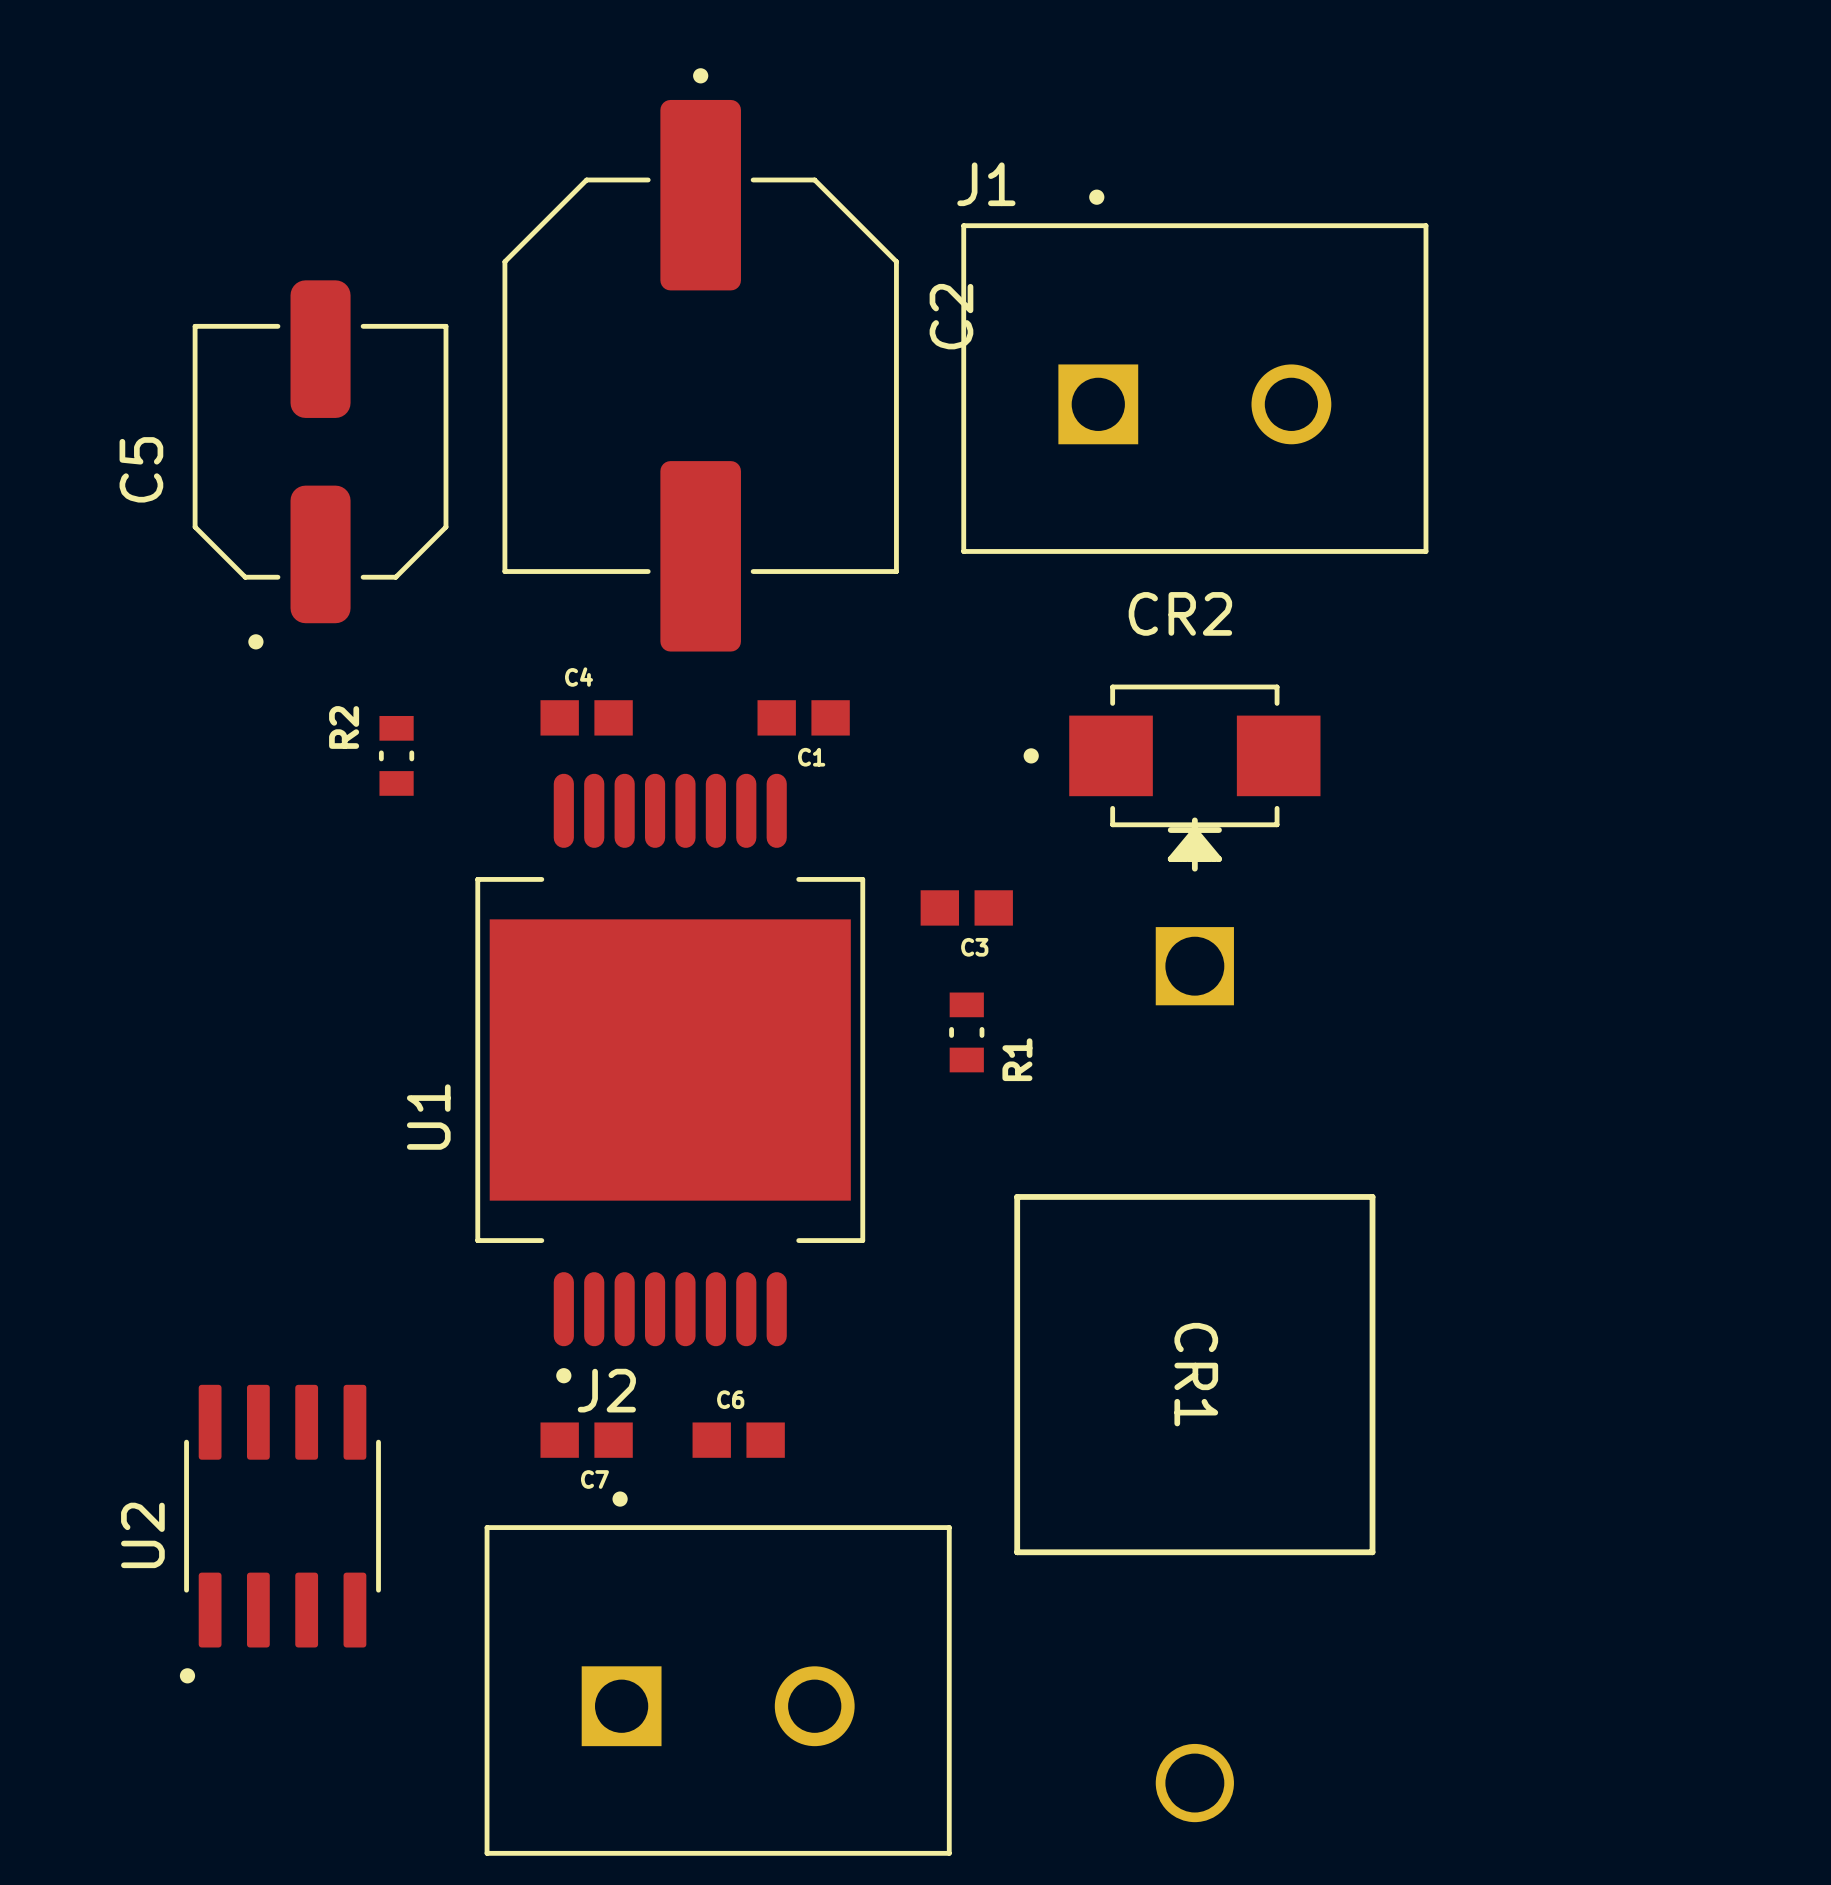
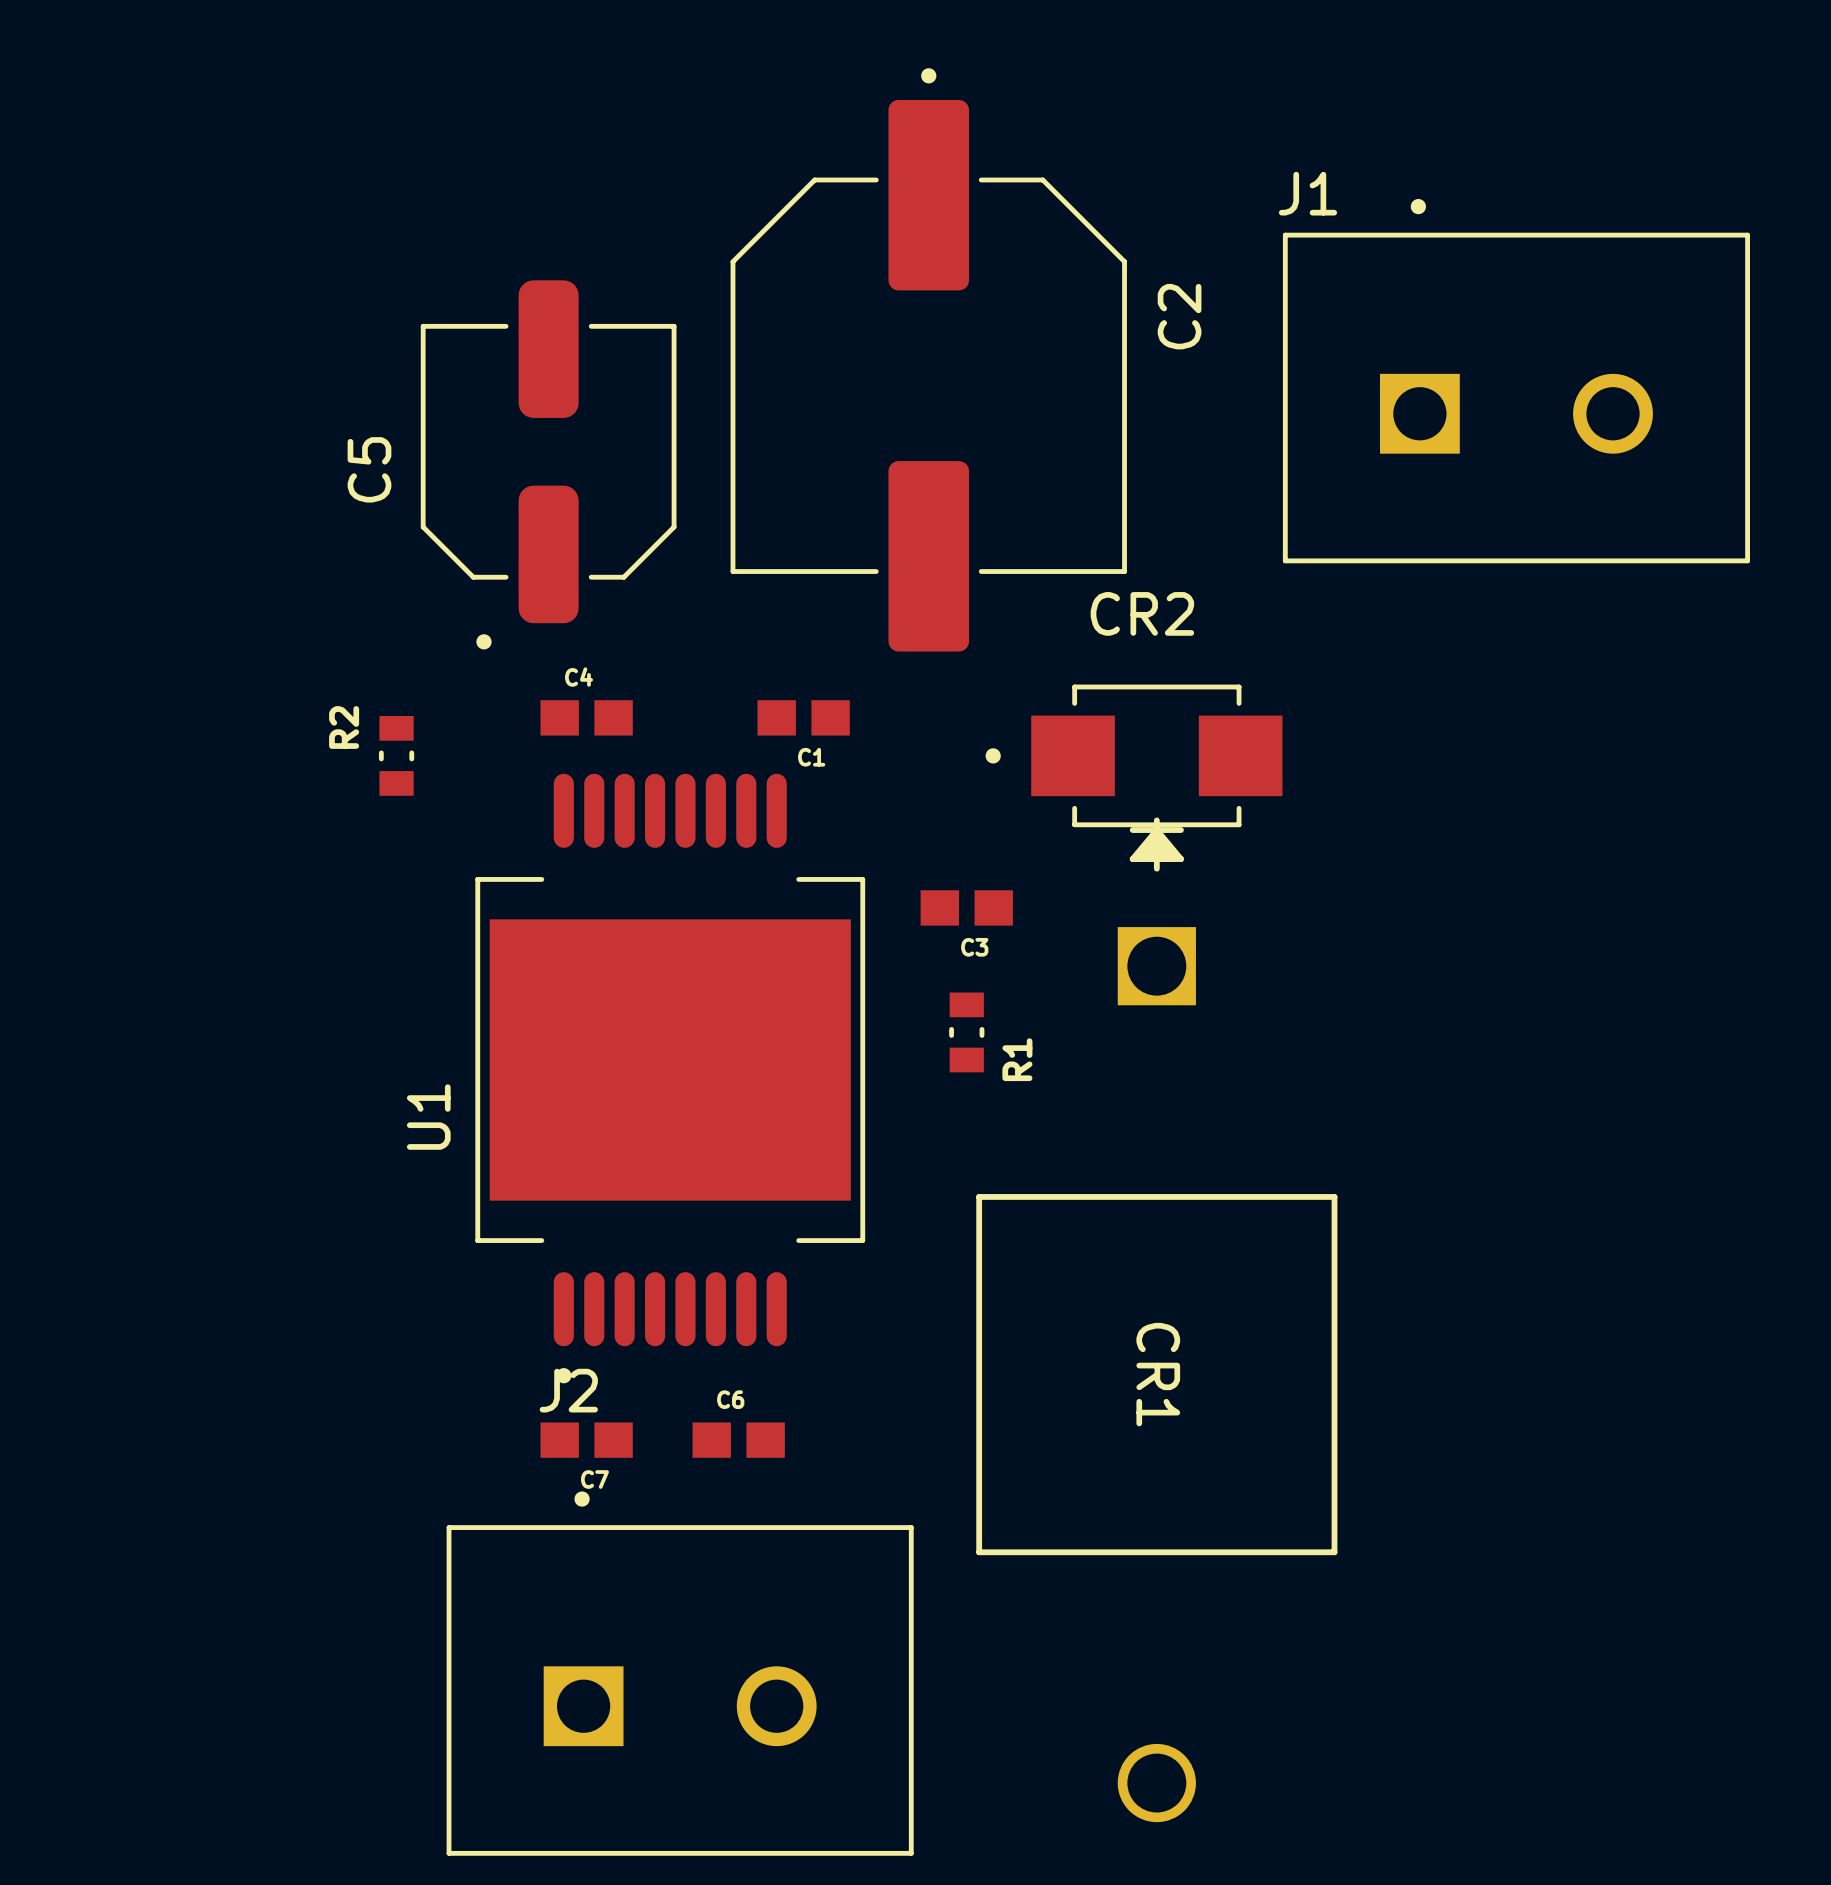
C2 position: (700, 359) -> (928, 359)
J1 position: (1194, 371) -> (1516, 381)
C5 position: (320, 464) -> (548, 464)
CR2 position: (1172, 755) -> (1134, 755)
CR1 position: (1194, 1319) -> (1156, 1319)
U2: (280, 1534) -> none
J2 position: (718, 1673) -> (680, 1673)

